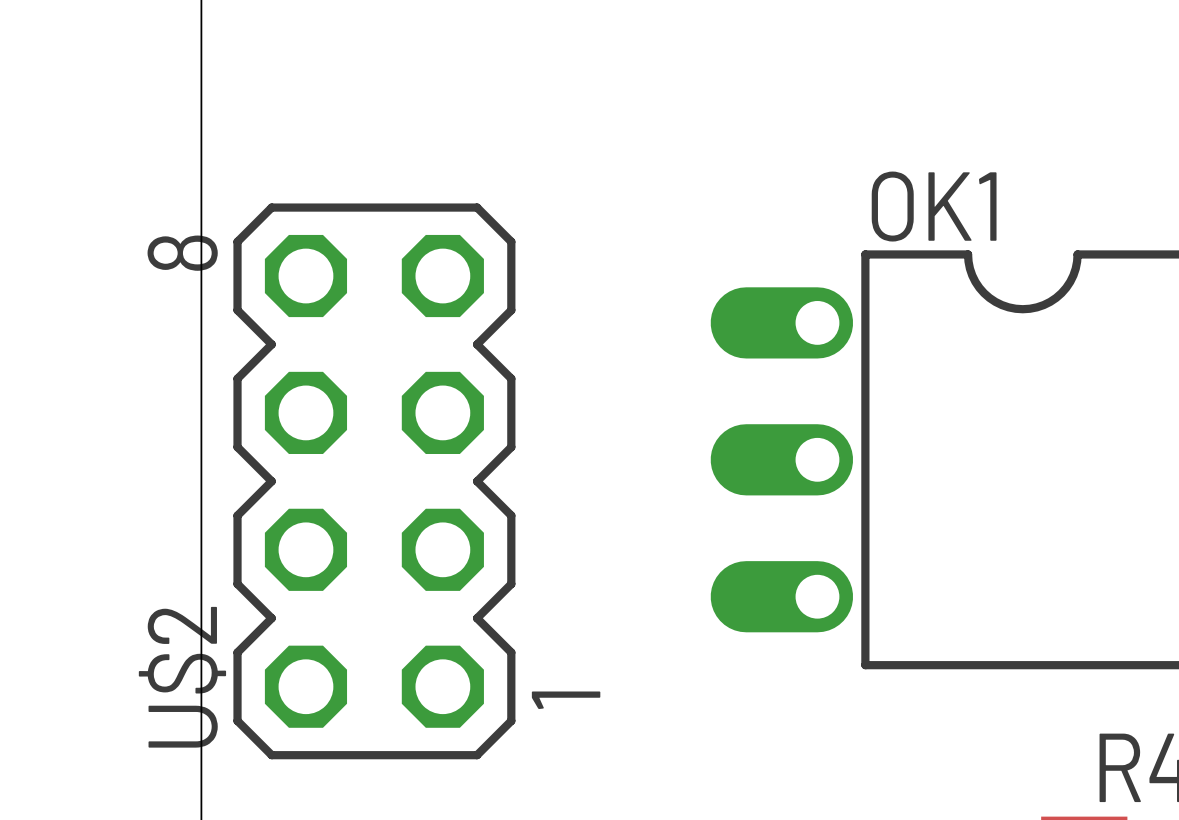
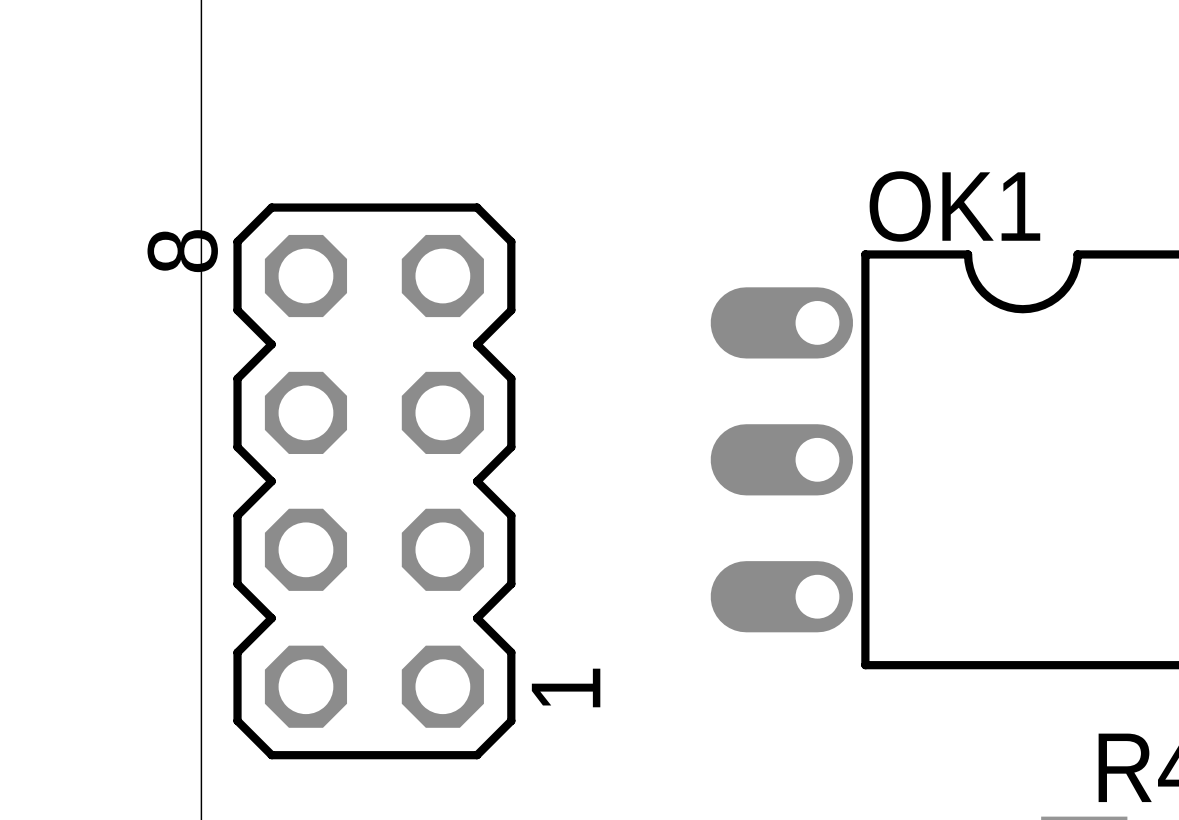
U$2 name: U$2 (182, 677) -> none

